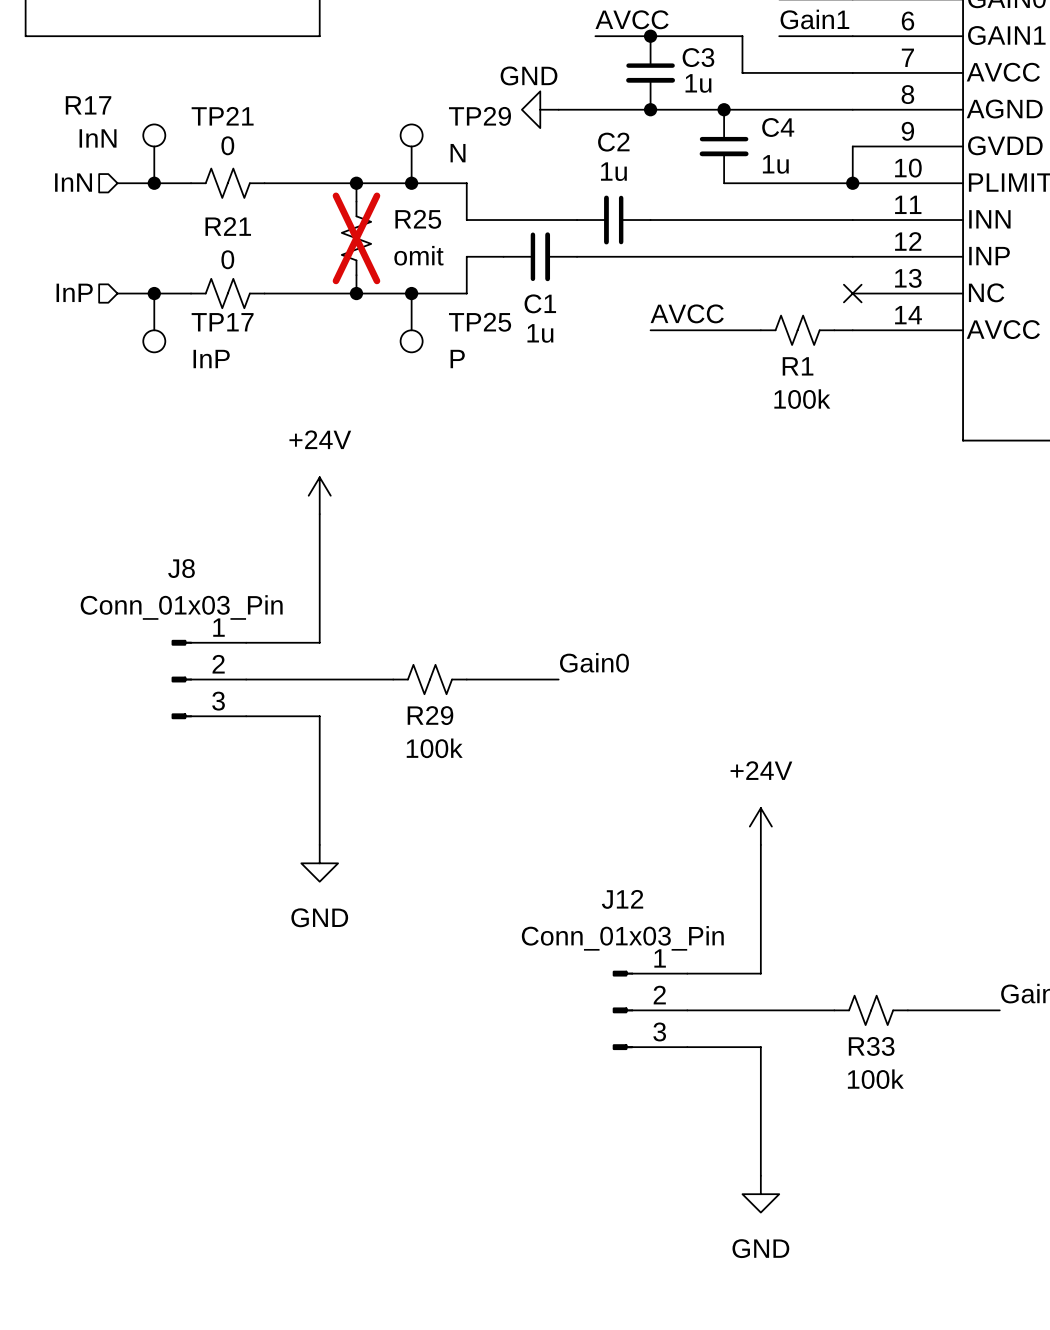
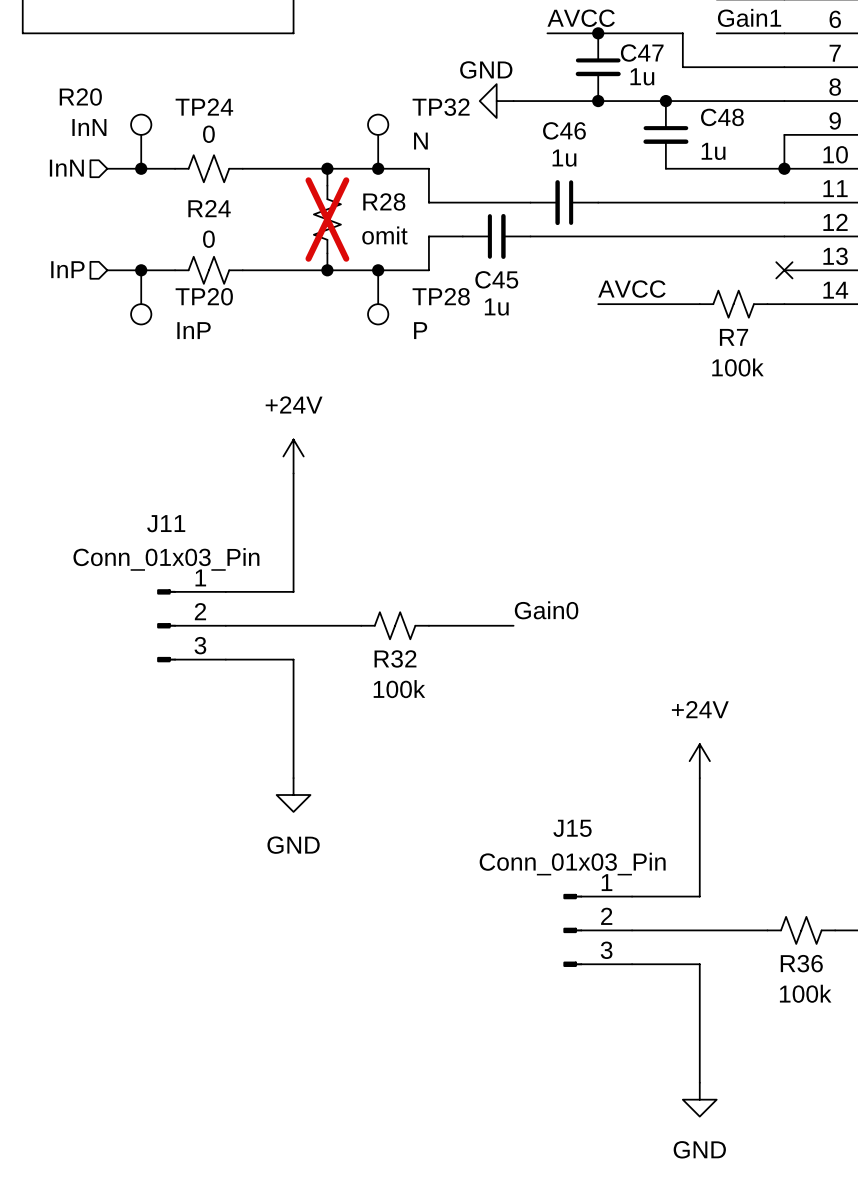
C3 name: C3 (698, 57) -> C47 (642, 53)
R17 name: R17 (88, 105) -> R20 (80, 97)
TP21 name: TP21 (222, 116) -> TP24 (204, 107)
TP29 name: TP29 (479, 116) -> TP32 (441, 107)
C4 name: C4 (778, 127) -> C48 (722, 117)
C2 name: C2 (613, 142) -> C46 (564, 130)
R25 name: R25 (418, 219) -> R28 (384, 201)
R21 name: R21 (228, 226) -> R24 (209, 208)
C1 name: C1 (540, 303) -> C45 (496, 279)
TP17 name: TP17 (222, 322) -> TP20 (204, 296)
TP25 name: TP25 (480, 322) -> TP28 (441, 296)
R1 name: R1 (798, 366) -> R7 (734, 337)
J8 name: J8 (181, 568) -> J11 (166, 523)
R29 name: R29 (430, 715) -> R32 (395, 658)
J12 name: J12 (622, 899) -> J15 (572, 828)
R33 name: R33 (871, 1046) -> R36 (801, 963)

